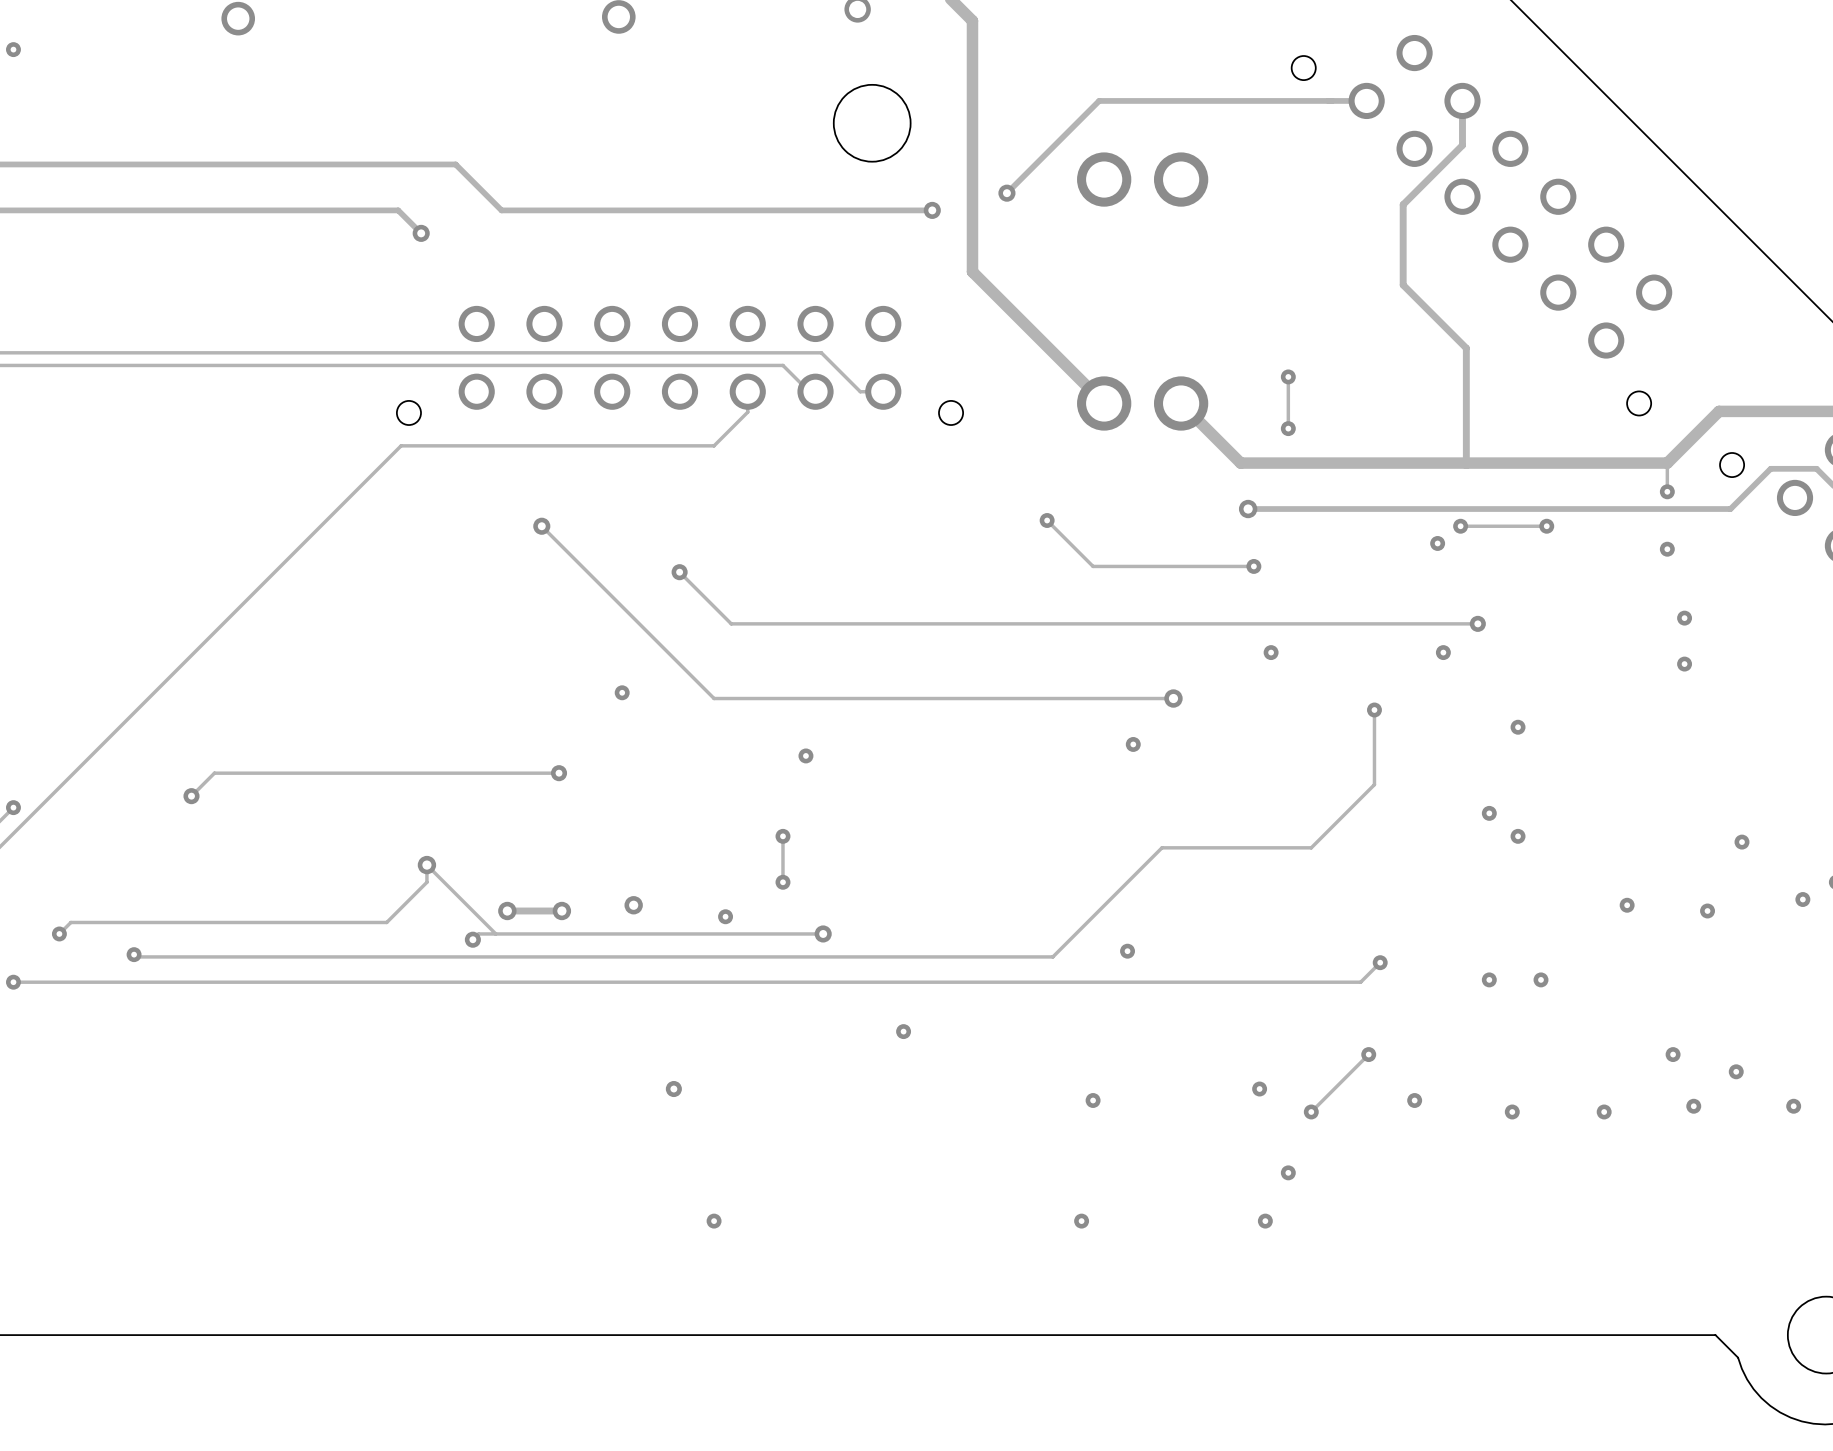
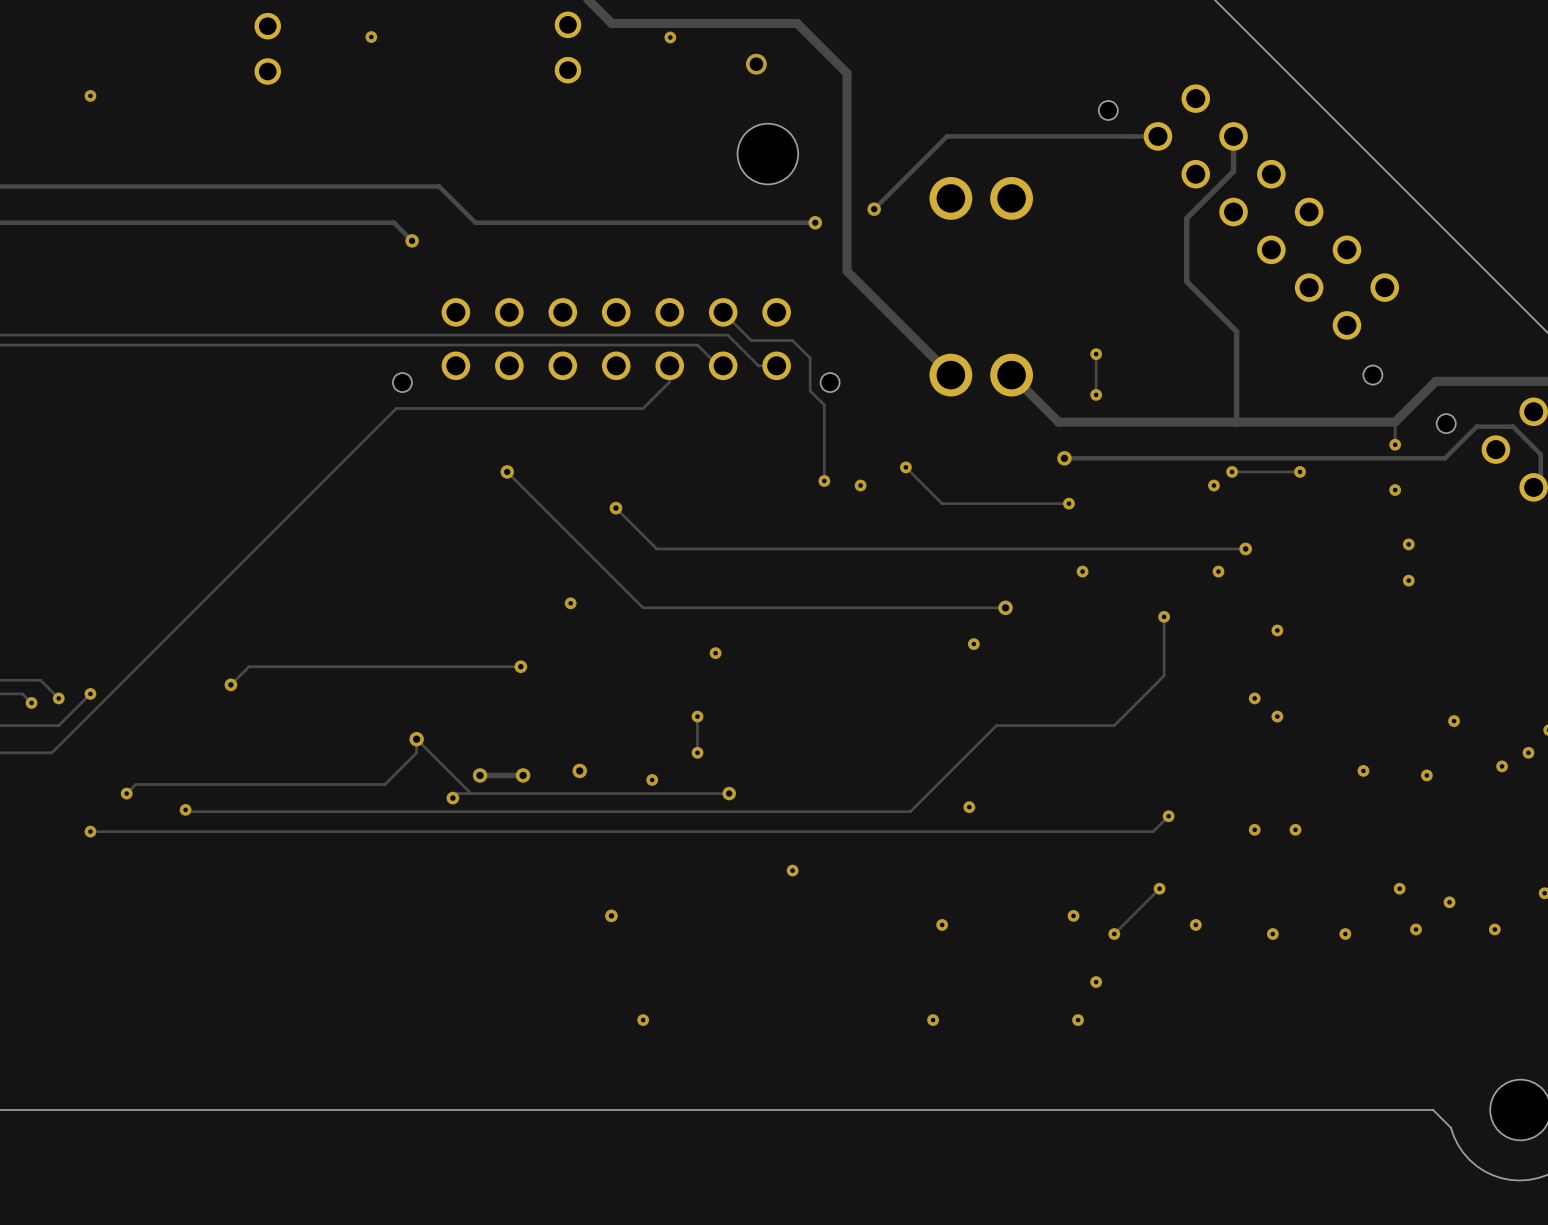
track: none -> (723, 312) (751, 340) (792, 340) (810, 358) (810, 390) (824, 405) (824, 480)
via: none -> (824, 480)
via: none -> (860, 485)

